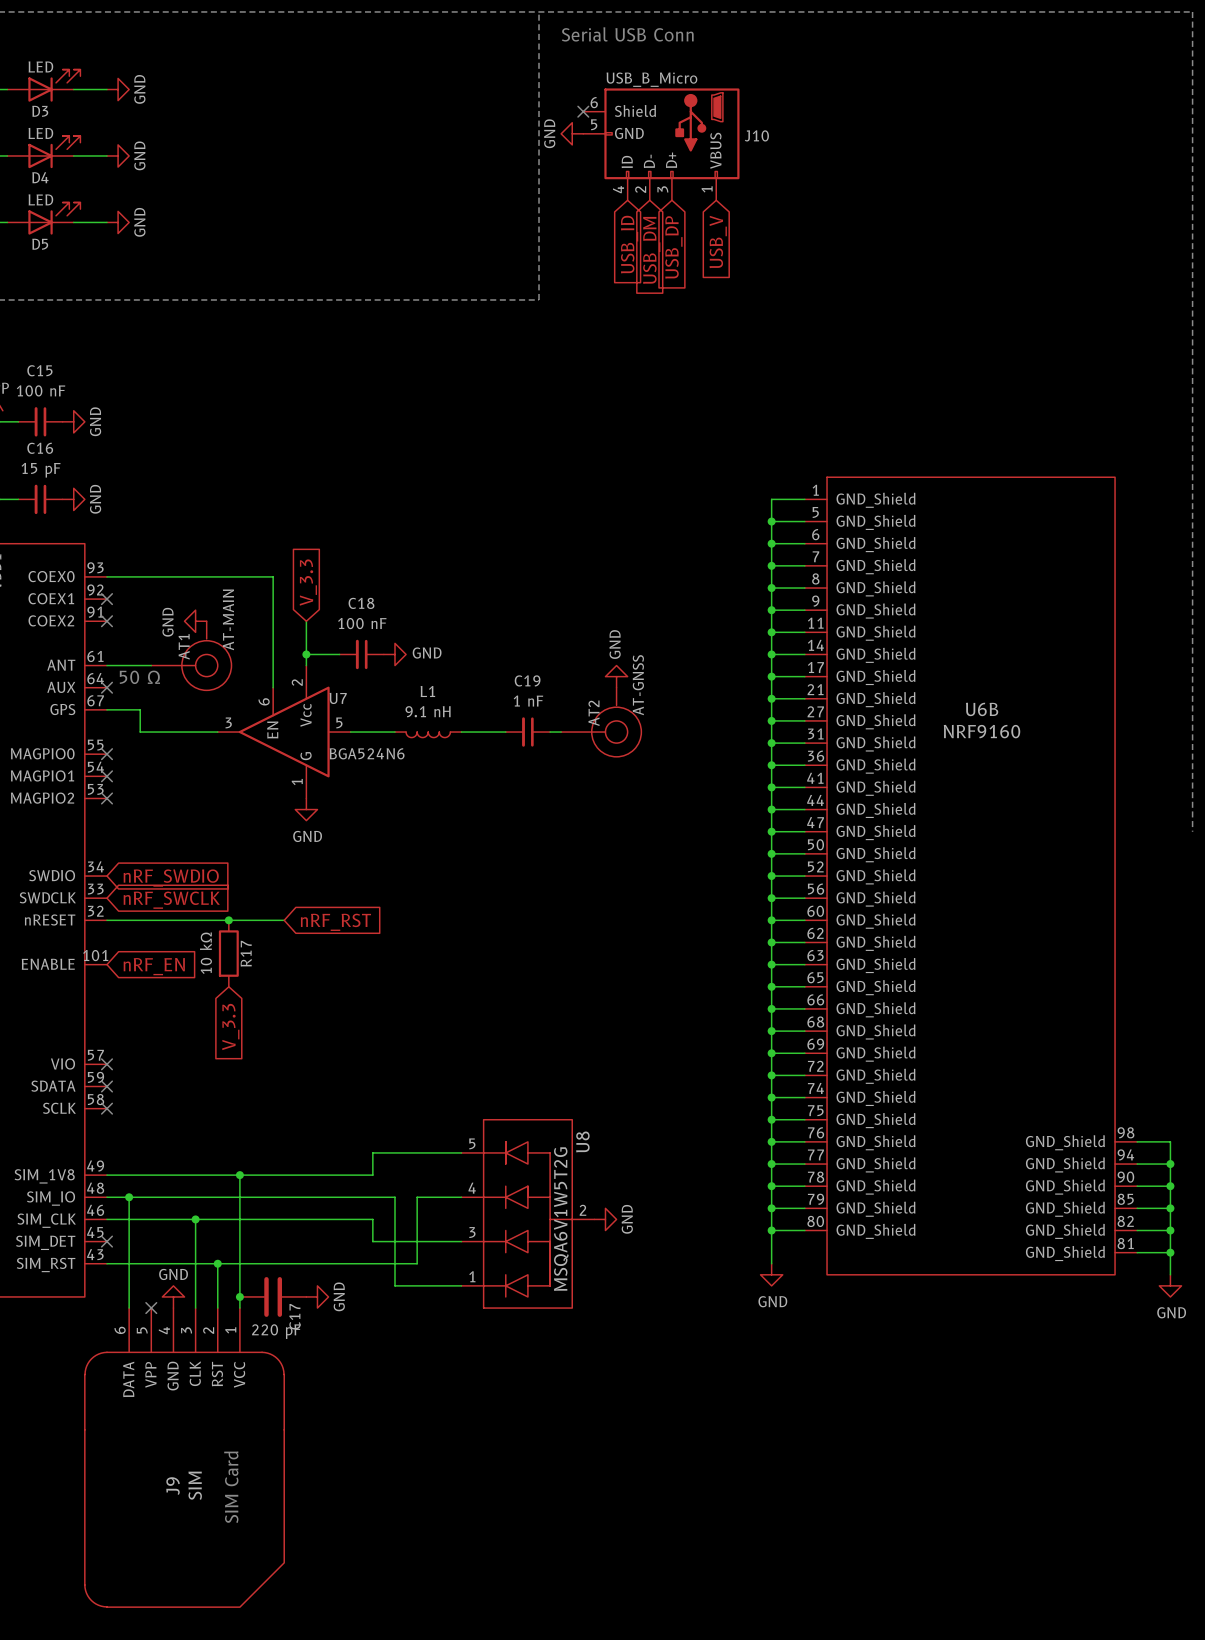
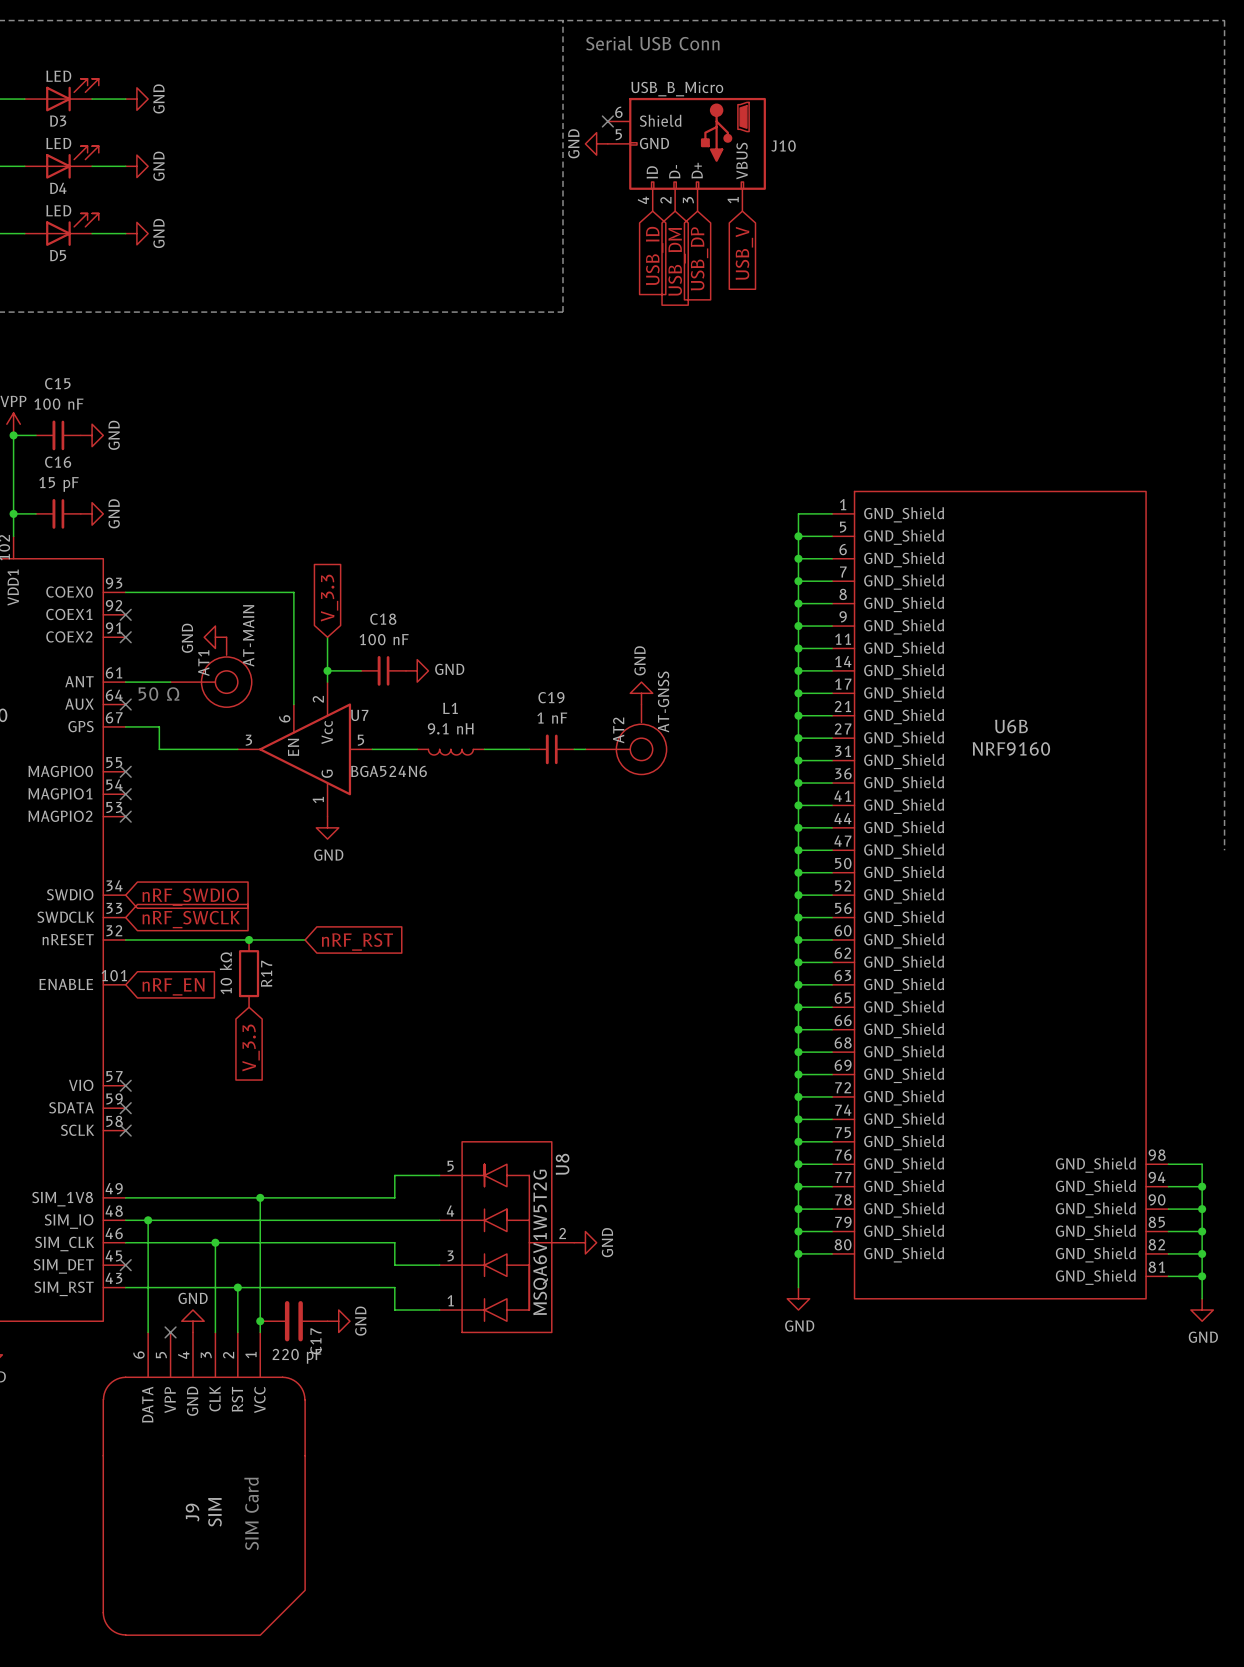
wire: (395, 1197) (395, 1285) -> (394, 1287) (394, 1310) (417, 1310)
wire: none -> (417, 1220) (439, 1220)
wire: (461, 1197) (417, 1197) (417, 1263) (372, 1263) -> none
U8 position: (527, 1213) -> (506, 1237)
power symbol position: GND (605, 1219) -> GND (585, 1242)

